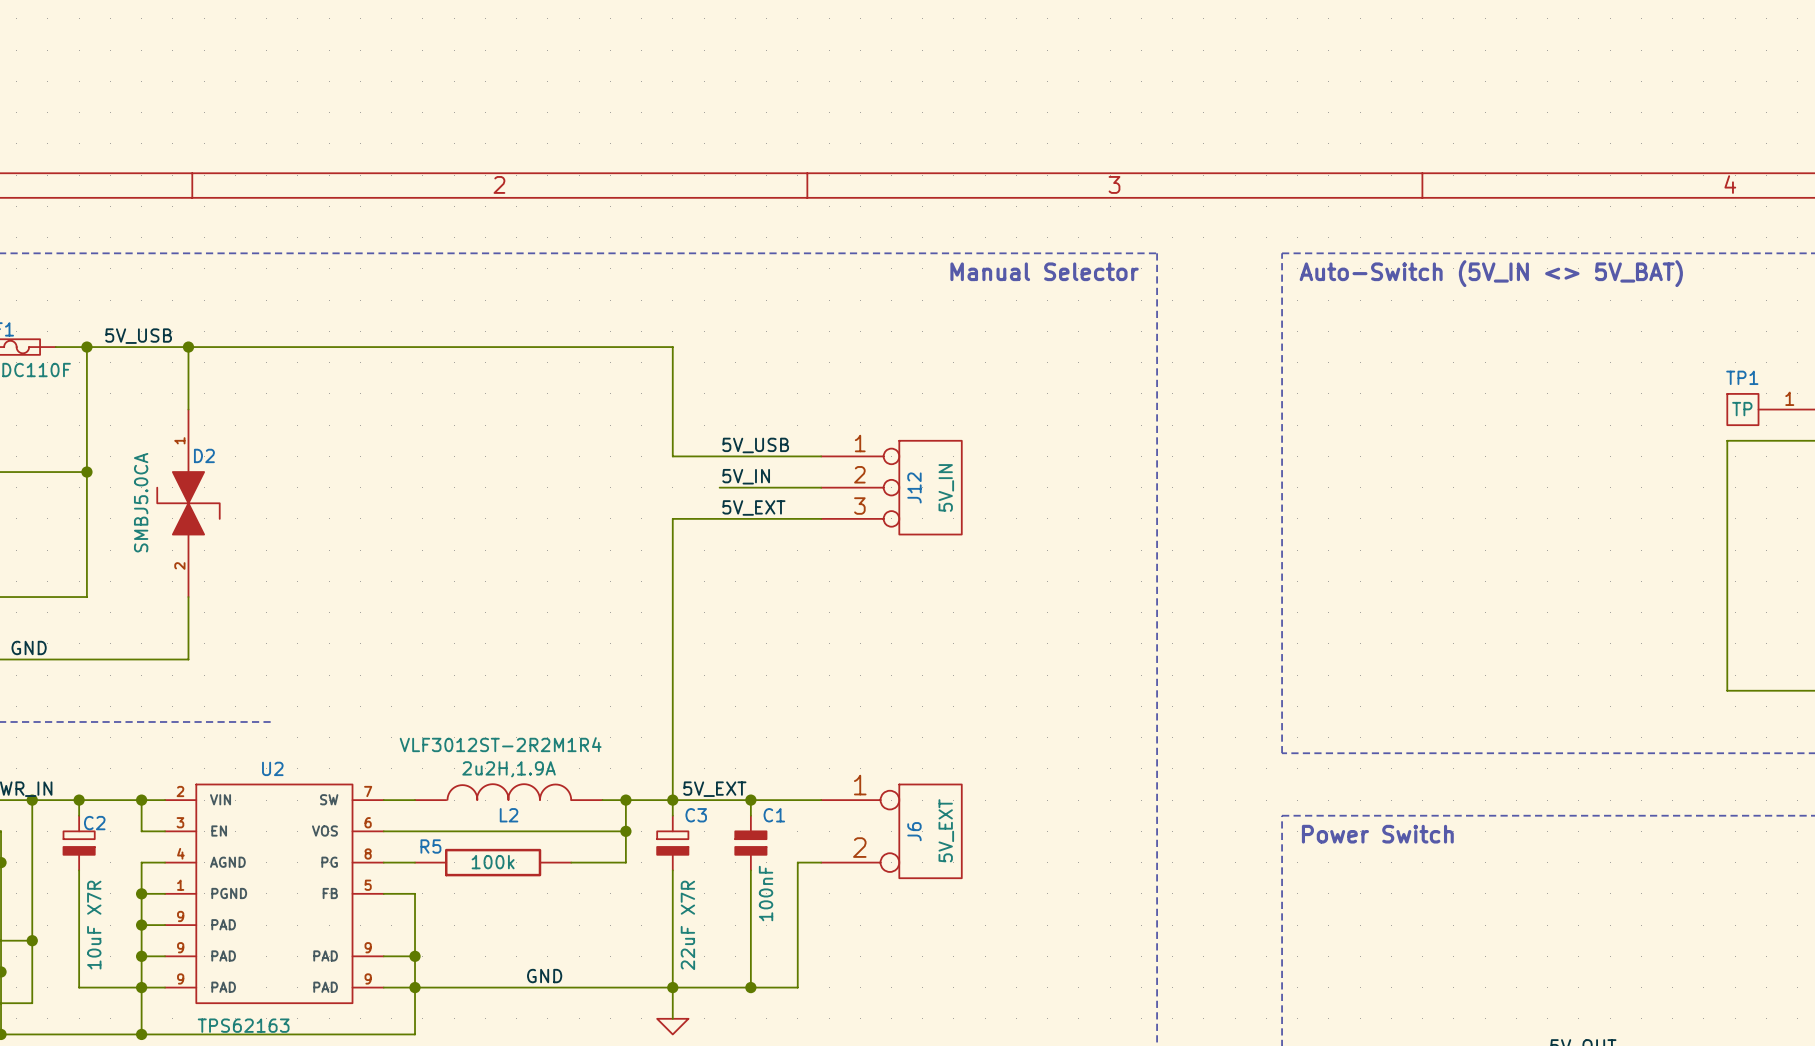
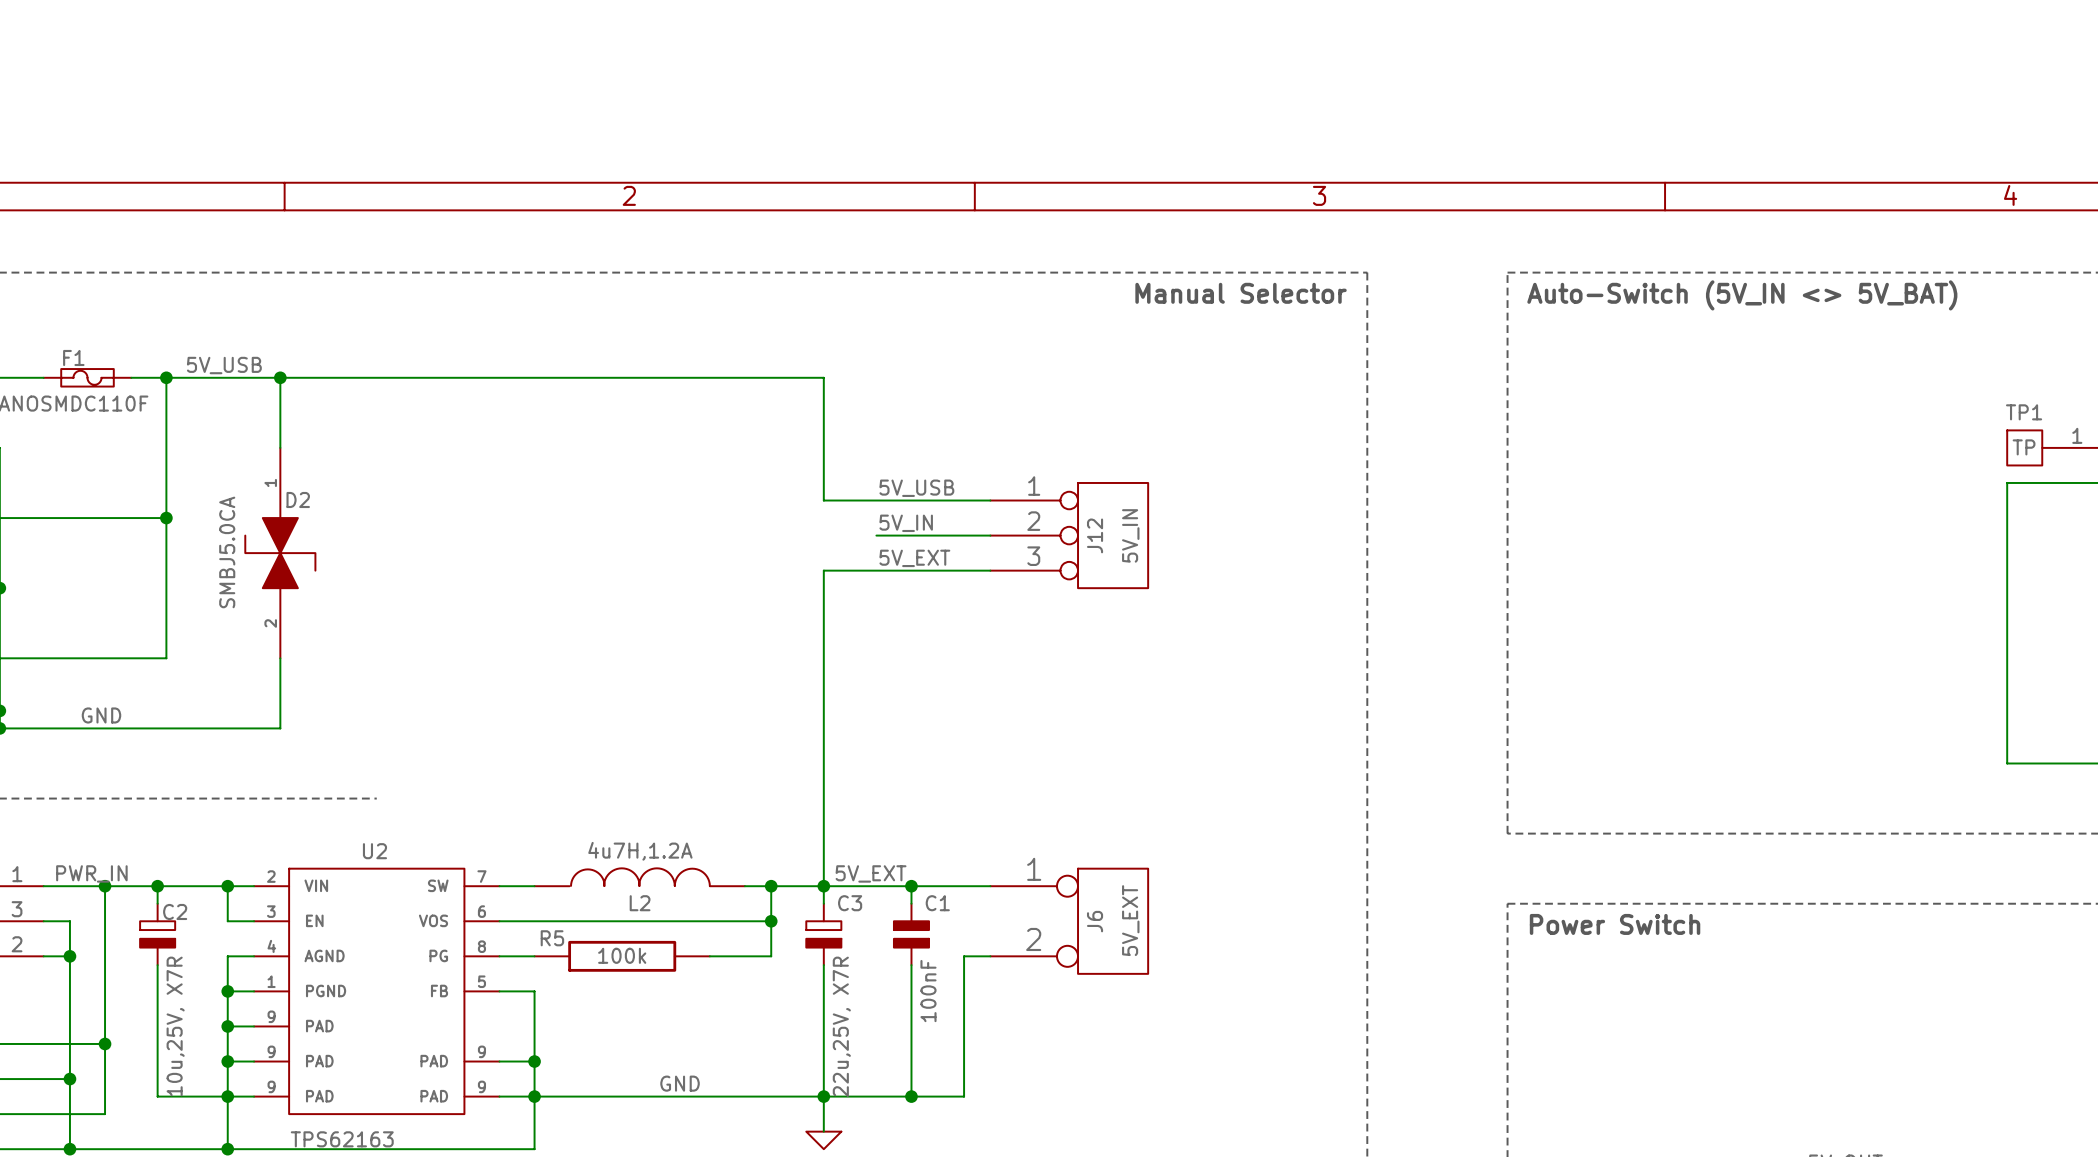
L2 text: VLF3012ST-2R2M1R4 (500, 744) -> none
L2 value: 2u2H,1.9A (509, 769) -> 4u7H,1.2A (640, 851)
C2 value: 10uF X7R (94, 925) -> 10u,25V, X7R (175, 1026)
C3 value: 22uF X7R (687, 925) -> 22u,25V, X7R (841, 1026)

